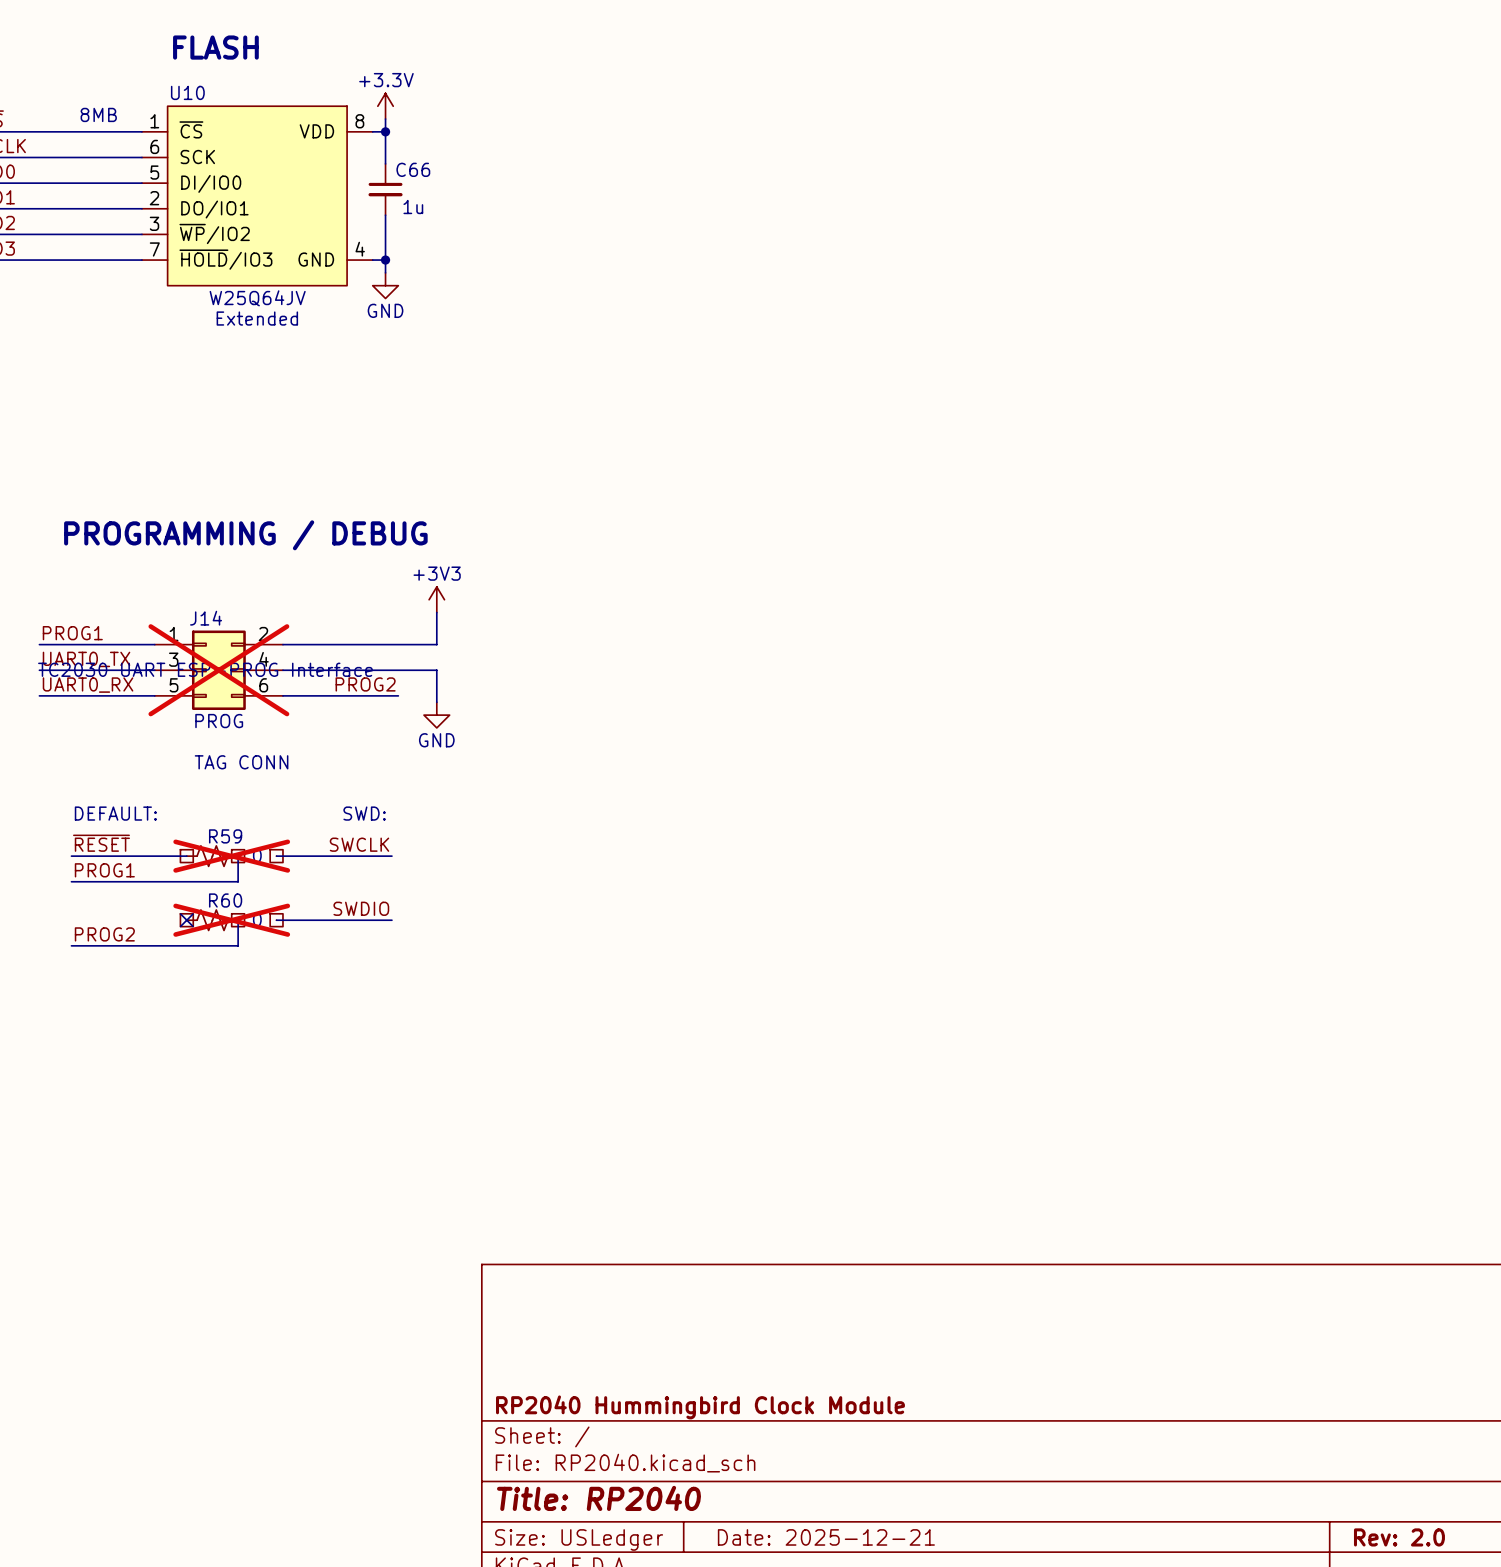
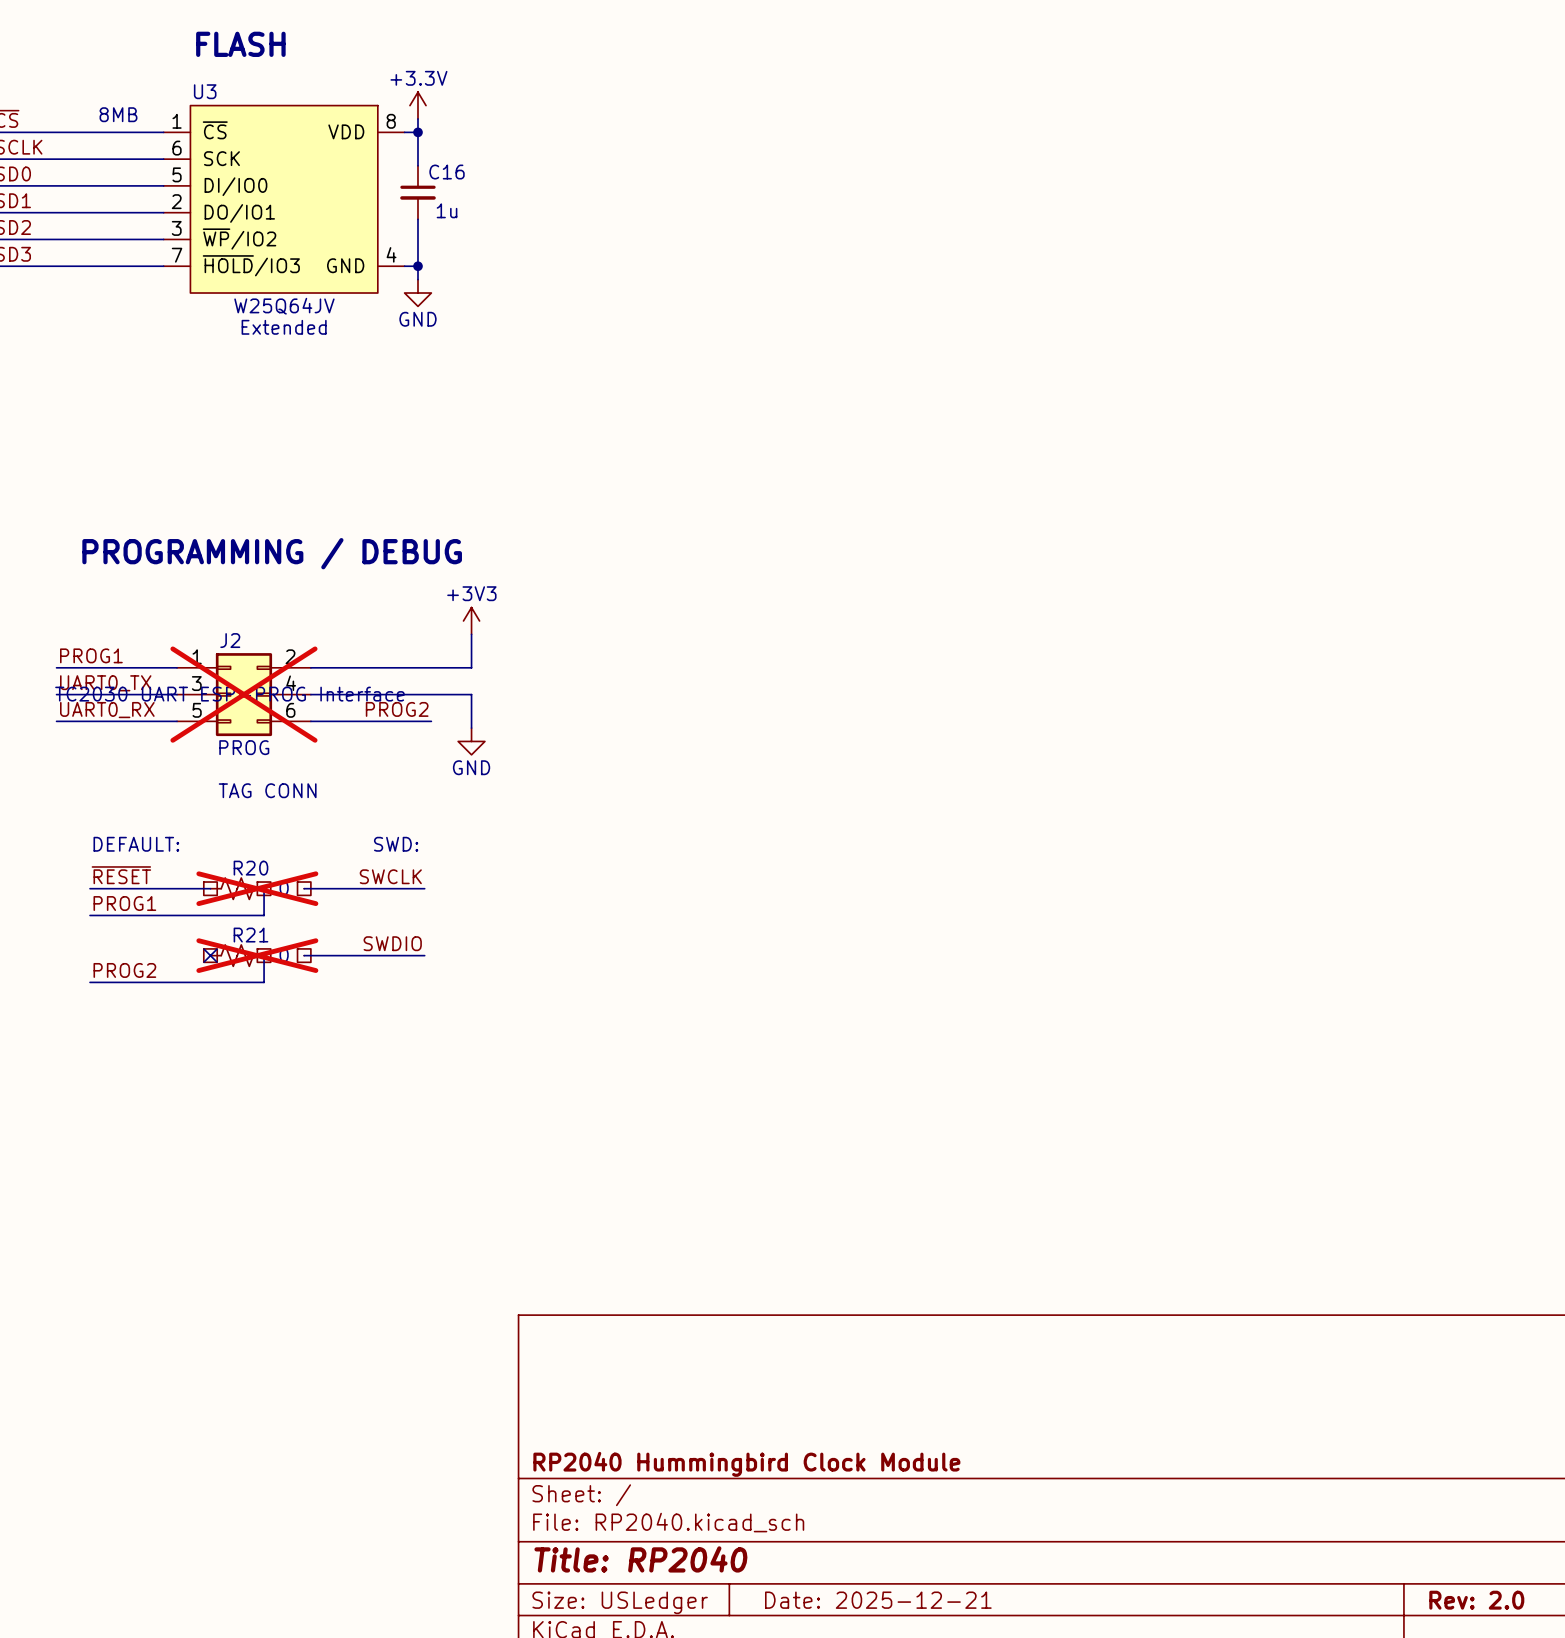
U10 name: U10 (187, 92) -> U3 (205, 91)
C66 name: C66 (413, 169) -> C16 (447, 172)
J14 name: J14 (206, 618) -> J2 (230, 640)
R59 name: R59 (225, 836) -> R20 (250, 868)
R60 name: R60 (225, 900) -> R21 (250, 935)

